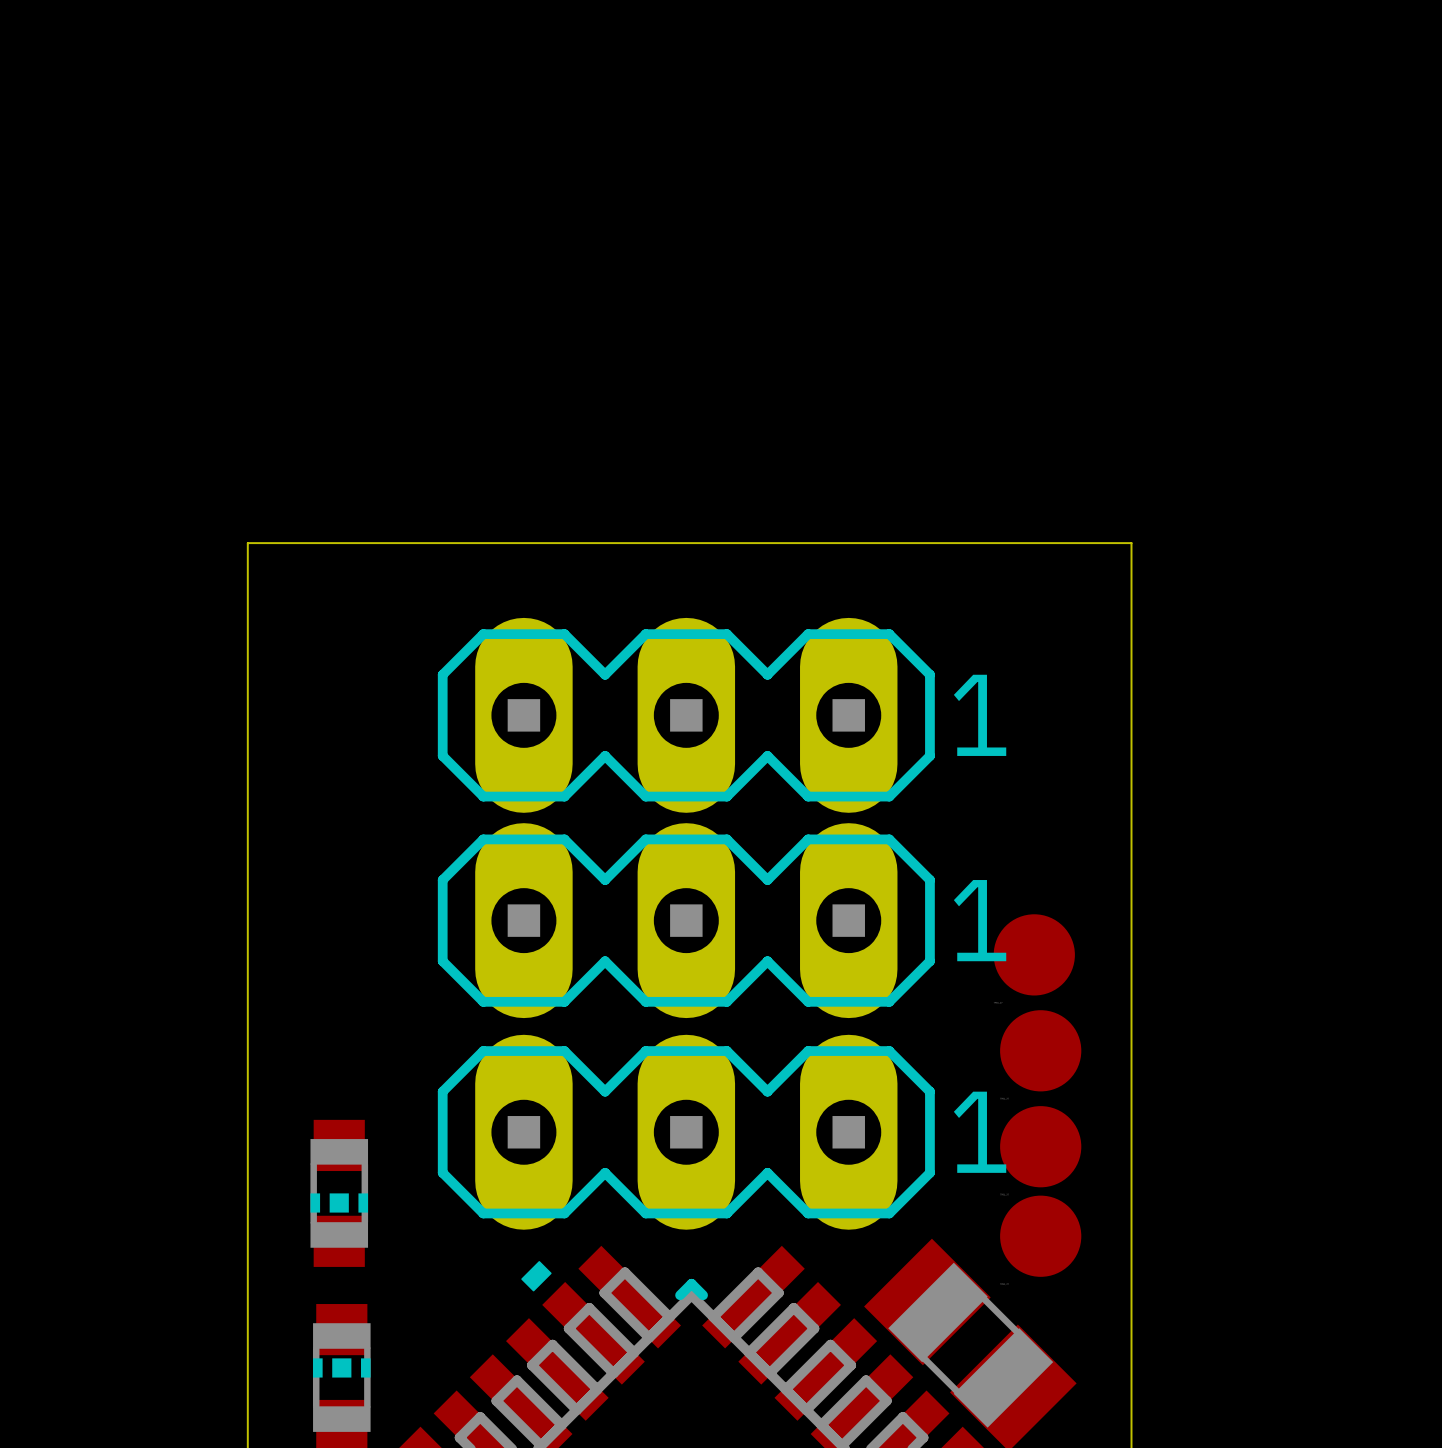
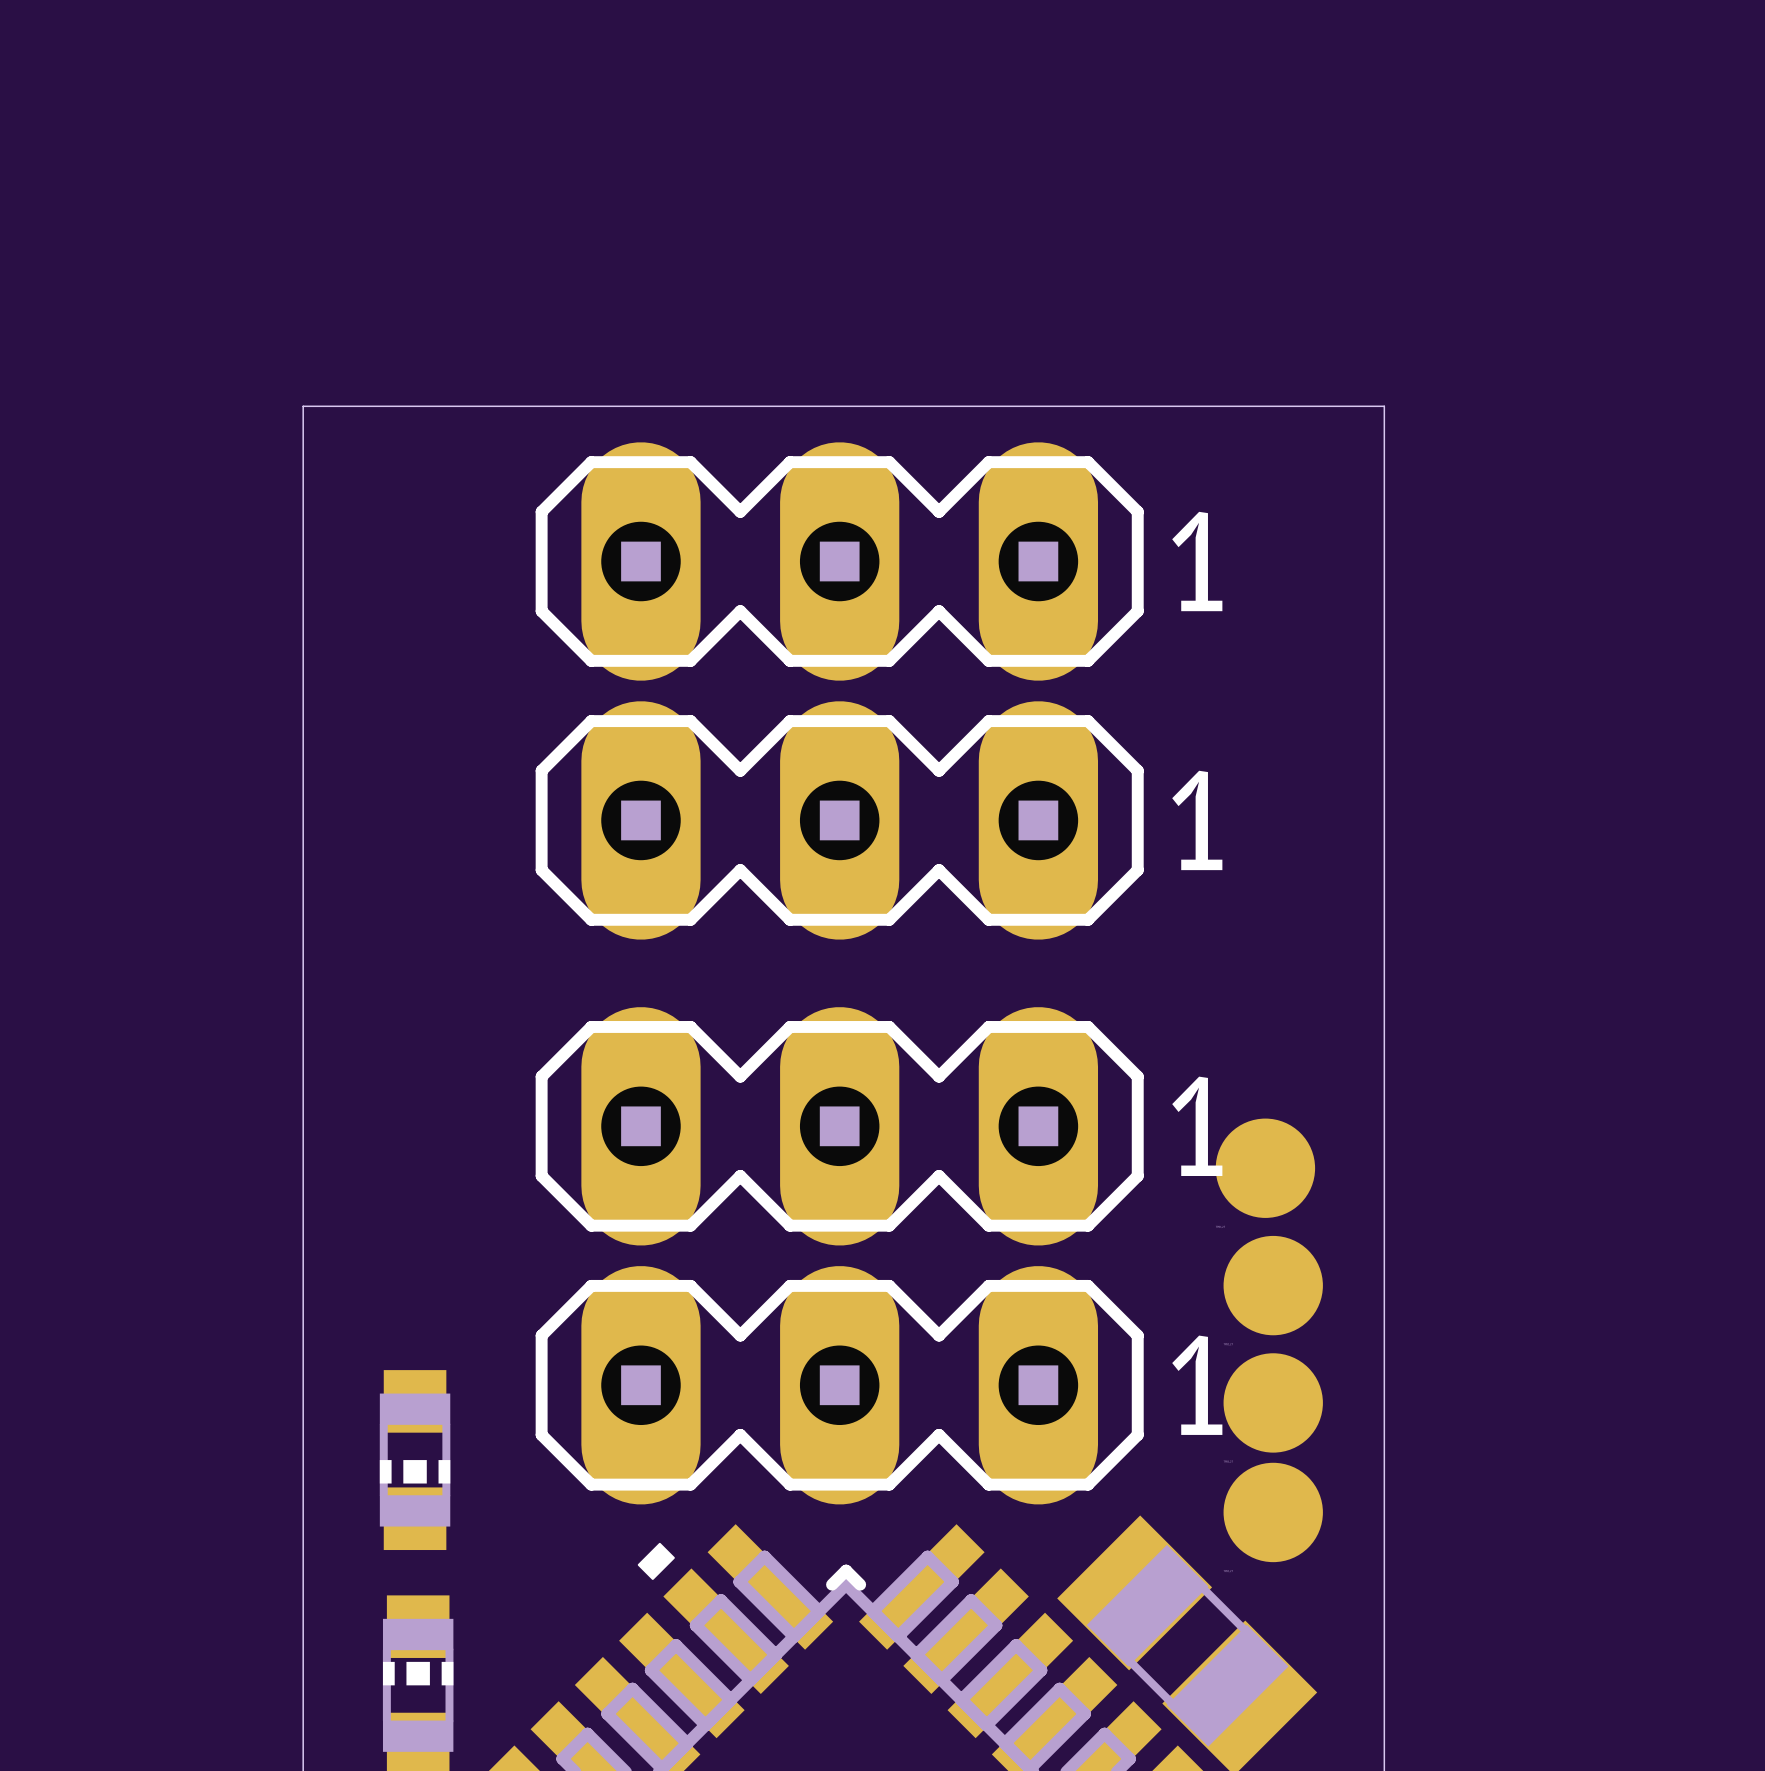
part: none -> (839, 561)
board edge: (247, 543) (1131, 543) -> (303, 664) (303, 406) (1384, 406) (1384, 664)
part position: (686, 715) -> (839, 820)

